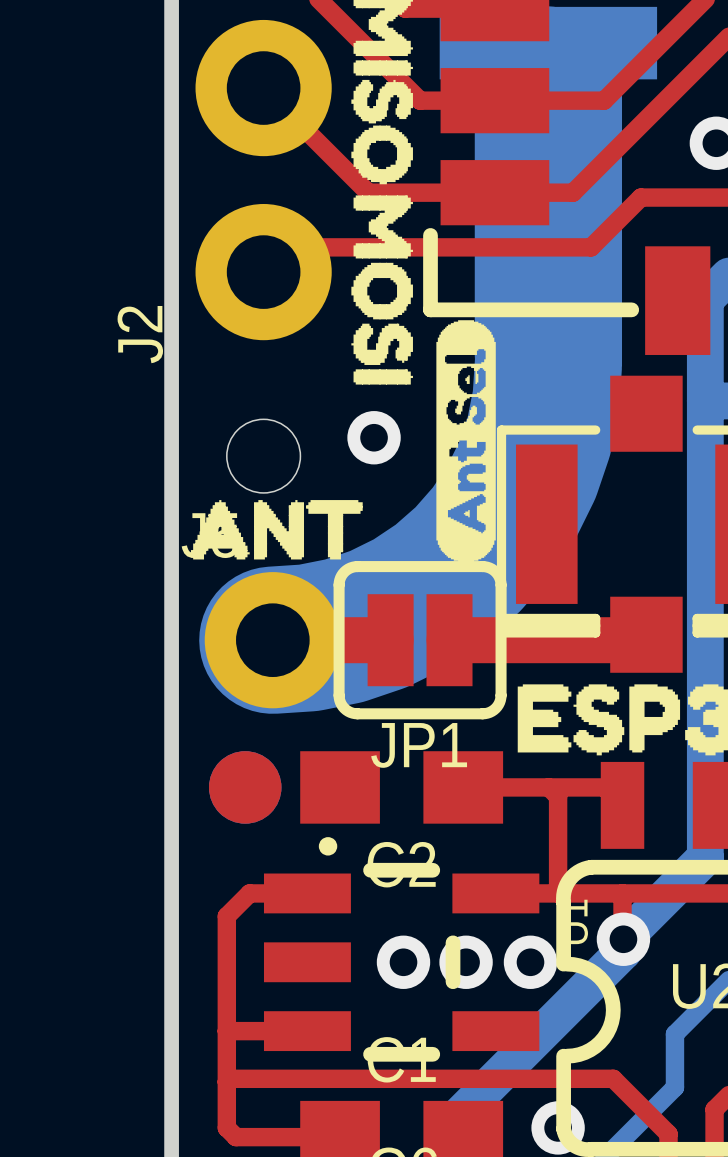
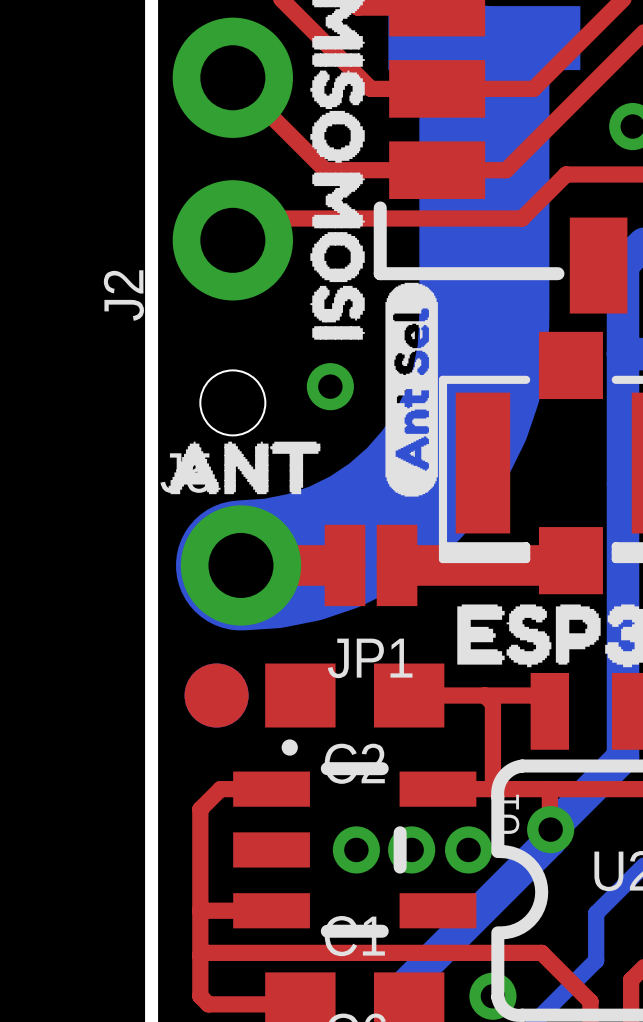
JP1 footprint: [333, 561, 507, 720] -> [324, 524, 418, 607]

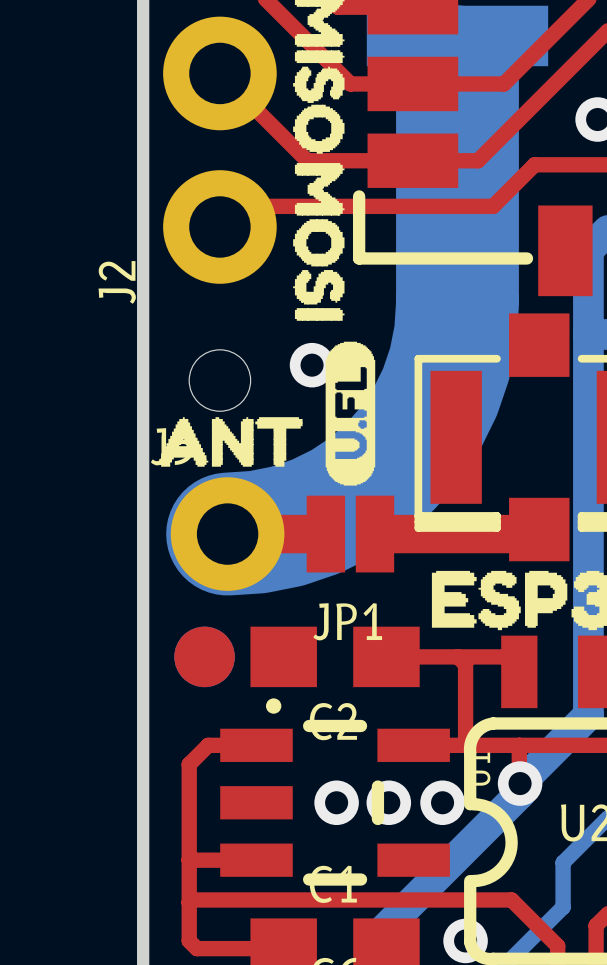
drawing shape: [385, 282, 438, 497] -> [325, 341, 376, 486]

